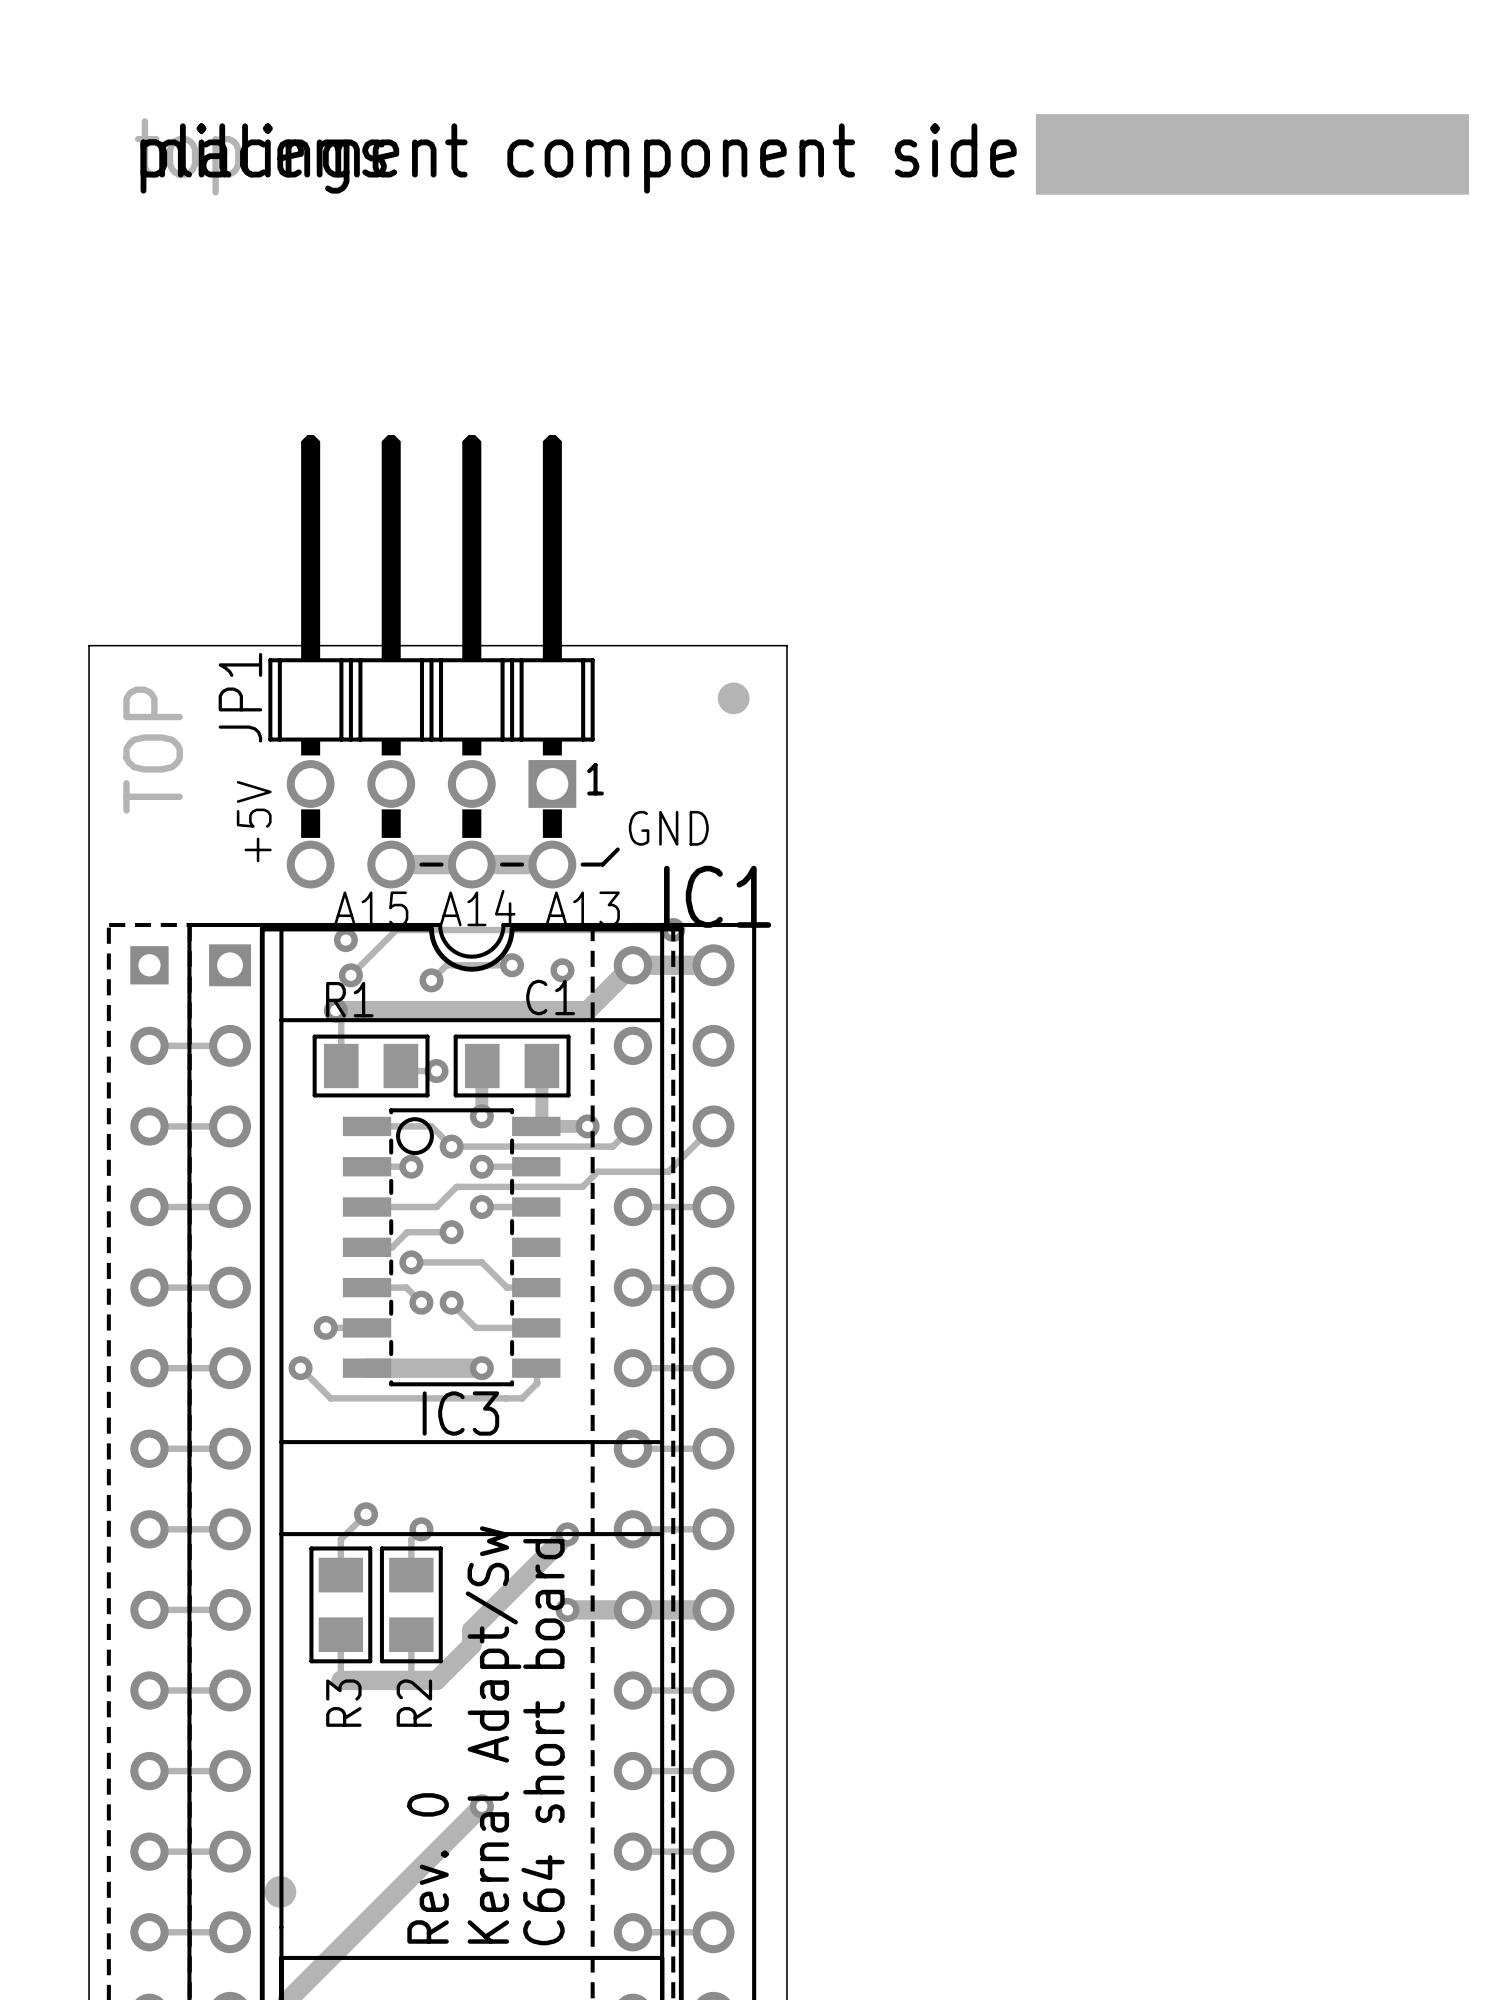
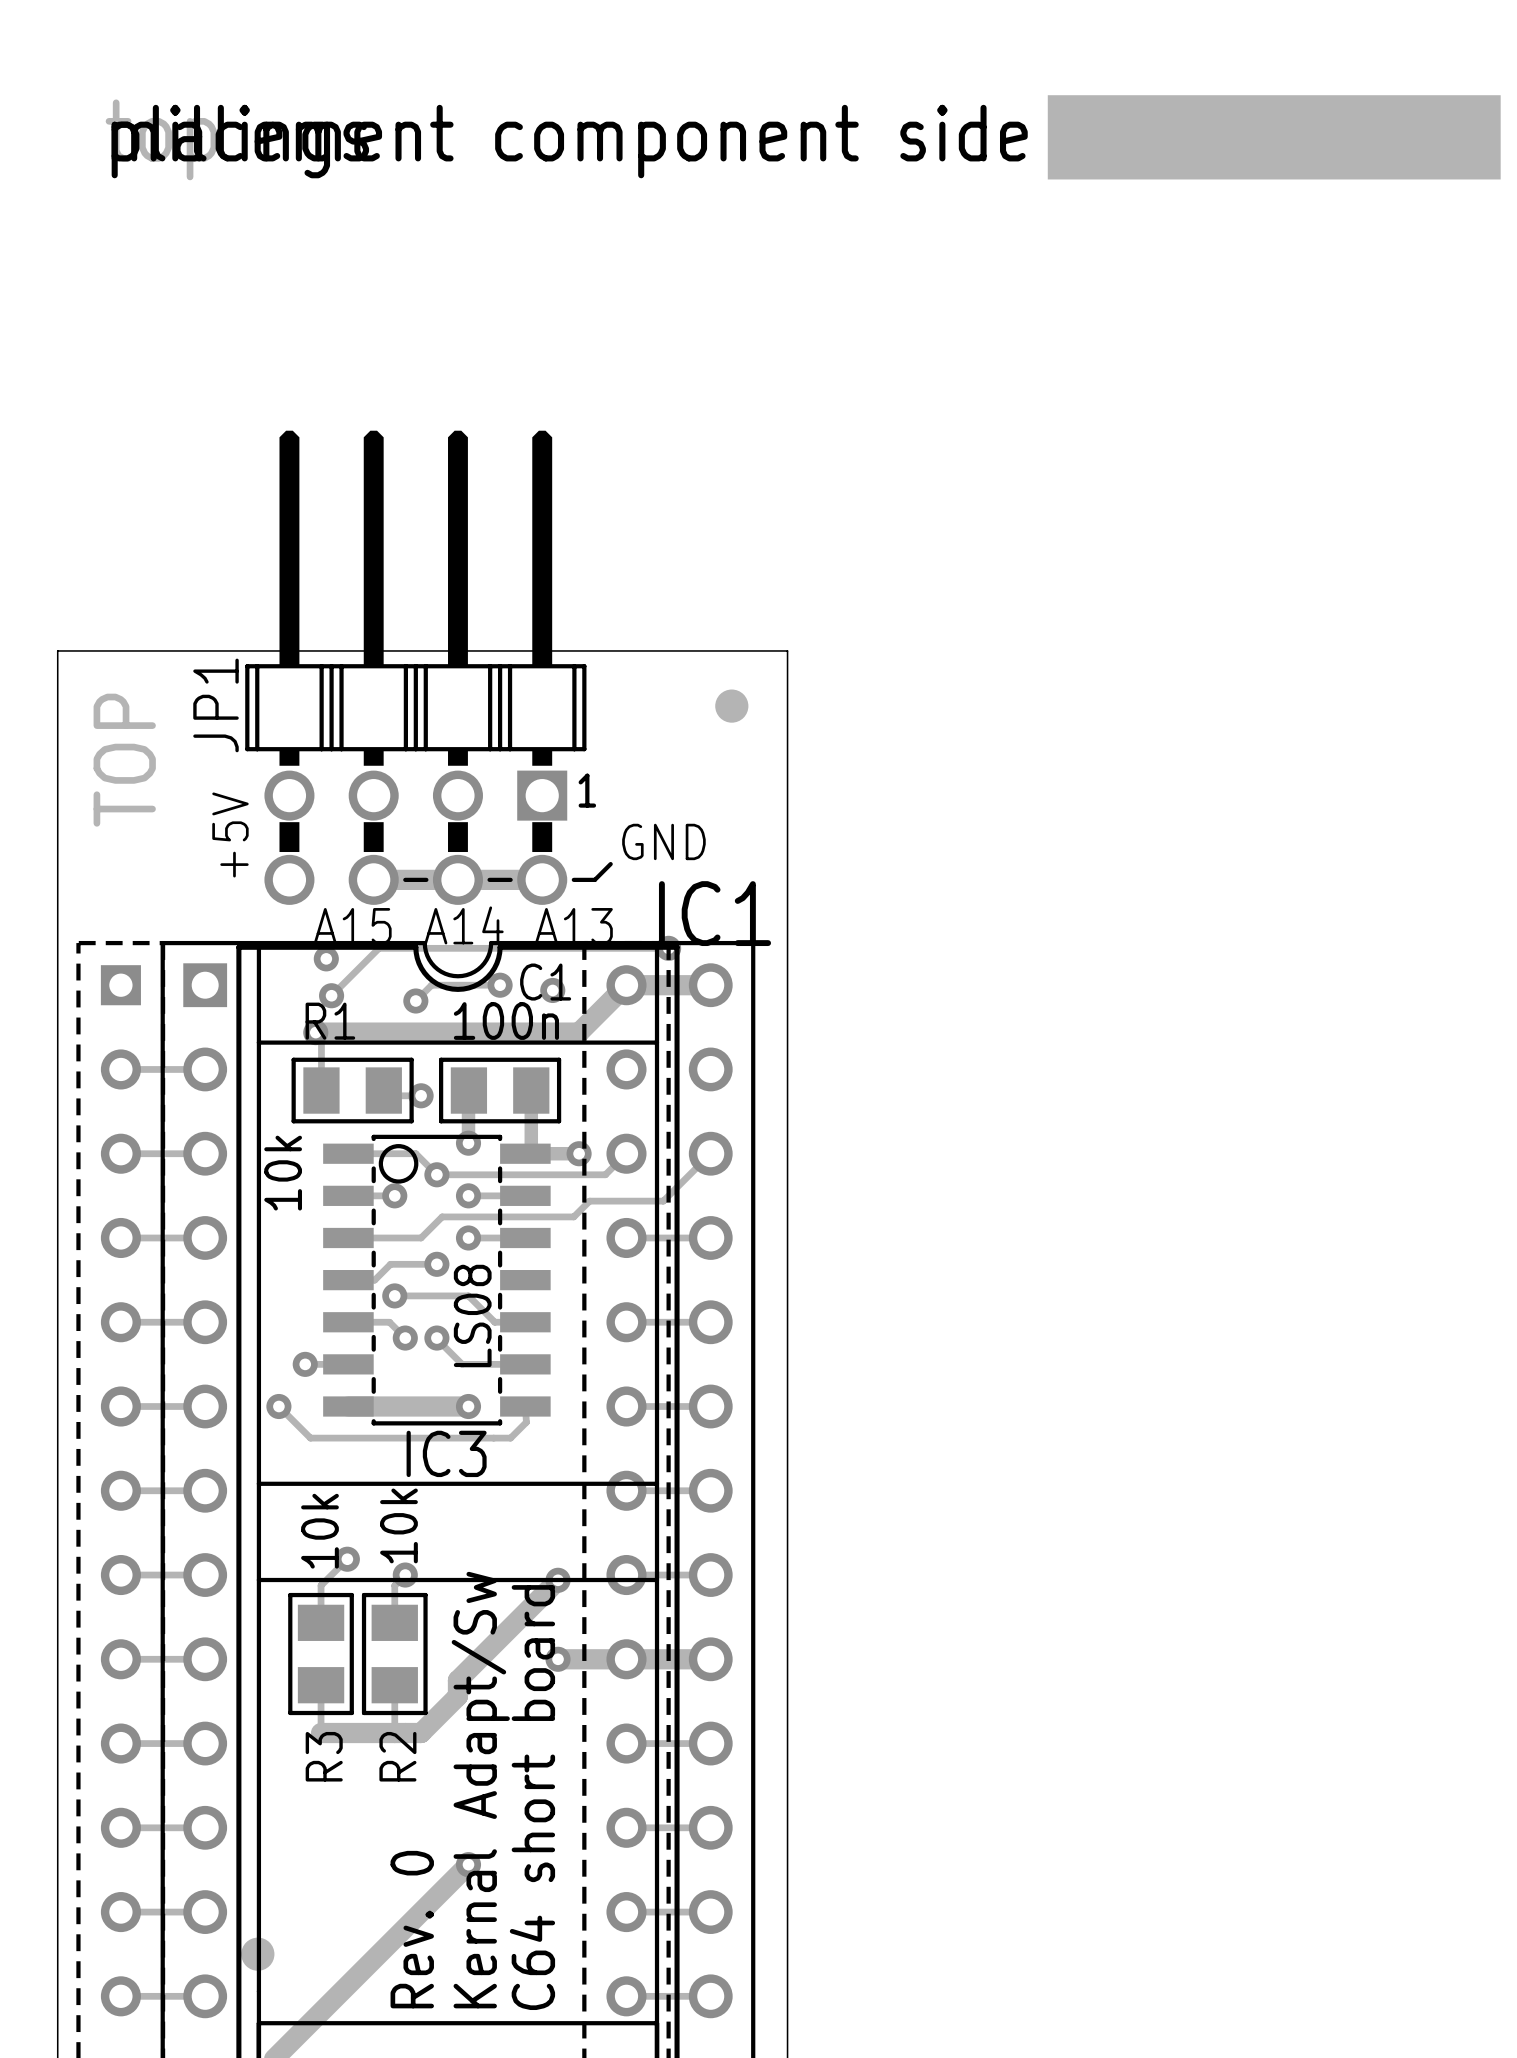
C1 name position: C1 (550, 997) -> C1 (545, 982)
text: none -> 100n (506, 1021)
text: none -> 10k (283, 1173)
text: none -> LS08 (472, 1315)
text: none -> 10k (398, 1525)
text: none -> 10k (319, 1531)

